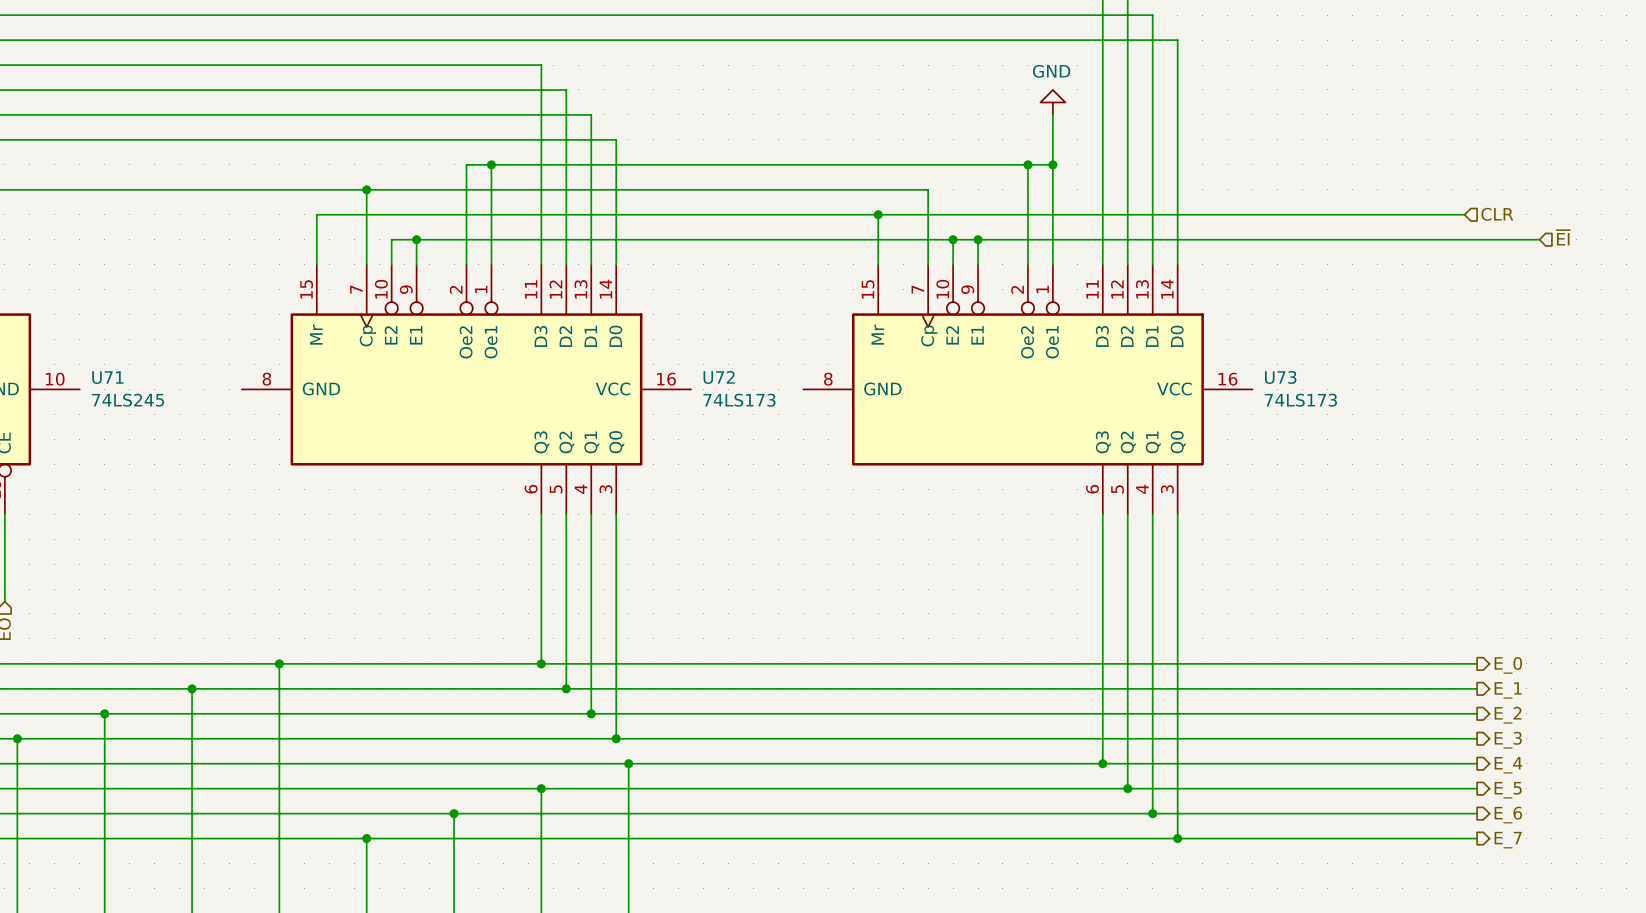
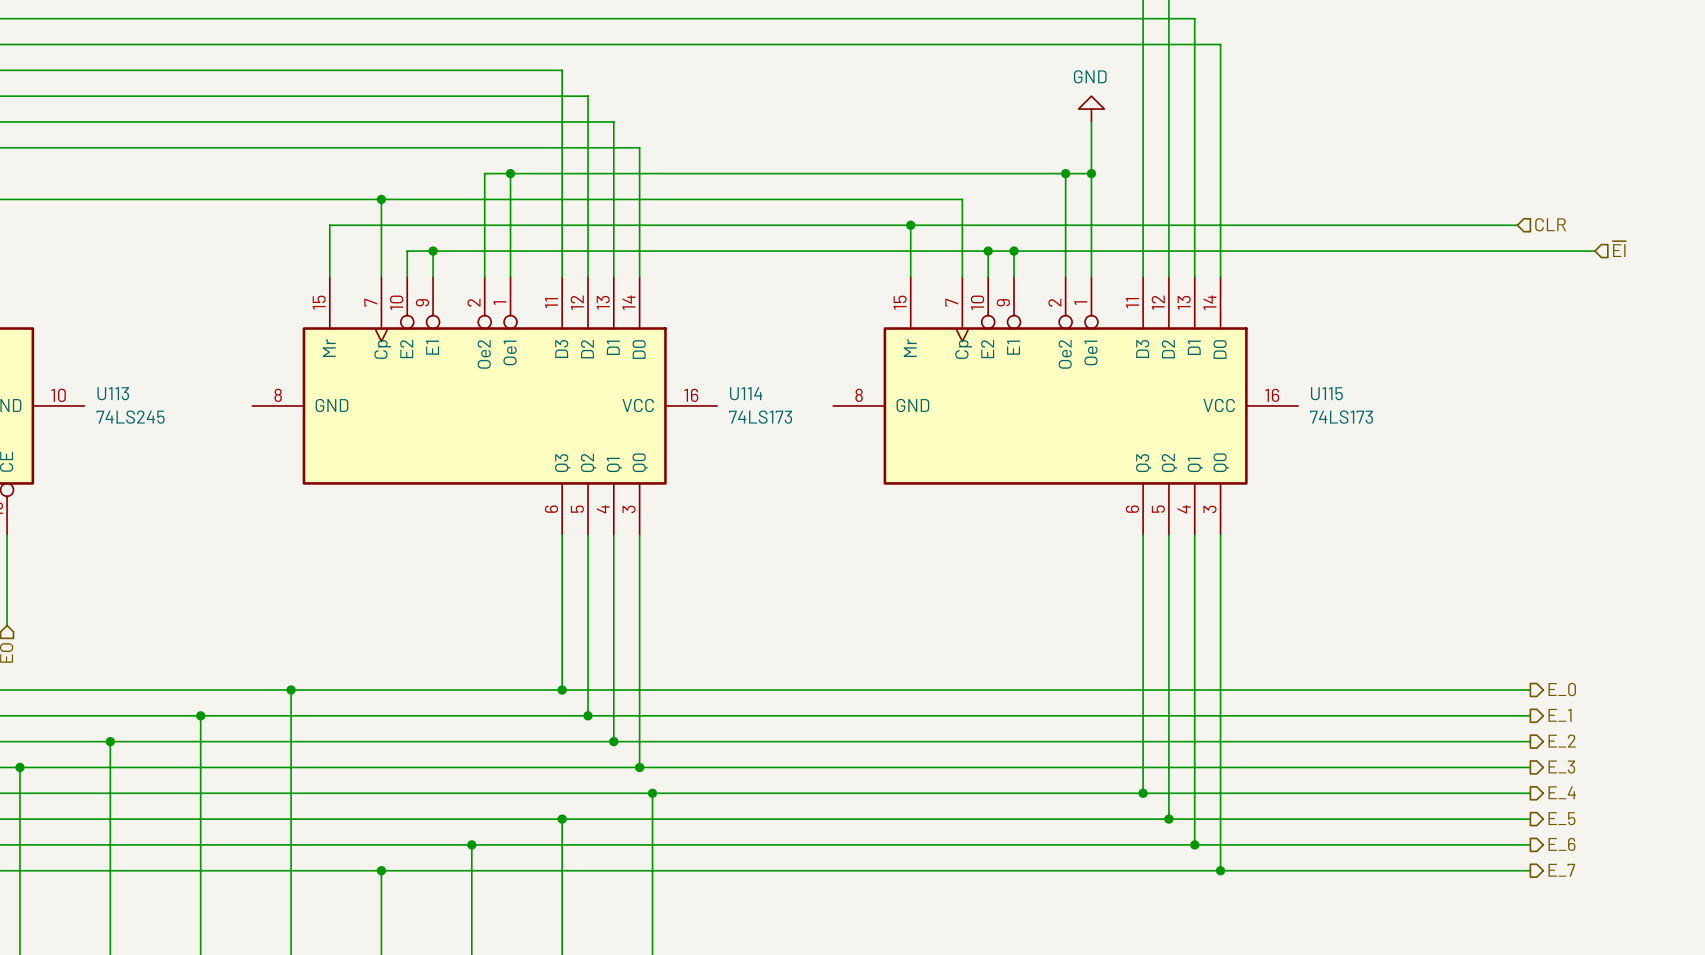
U71 name: U71 (107, 377) -> U113 (113, 393)
U72 name: U72 (719, 377) -> U114 (746, 393)
U73 name: U73 (1280, 377) -> U115 (1326, 393)

